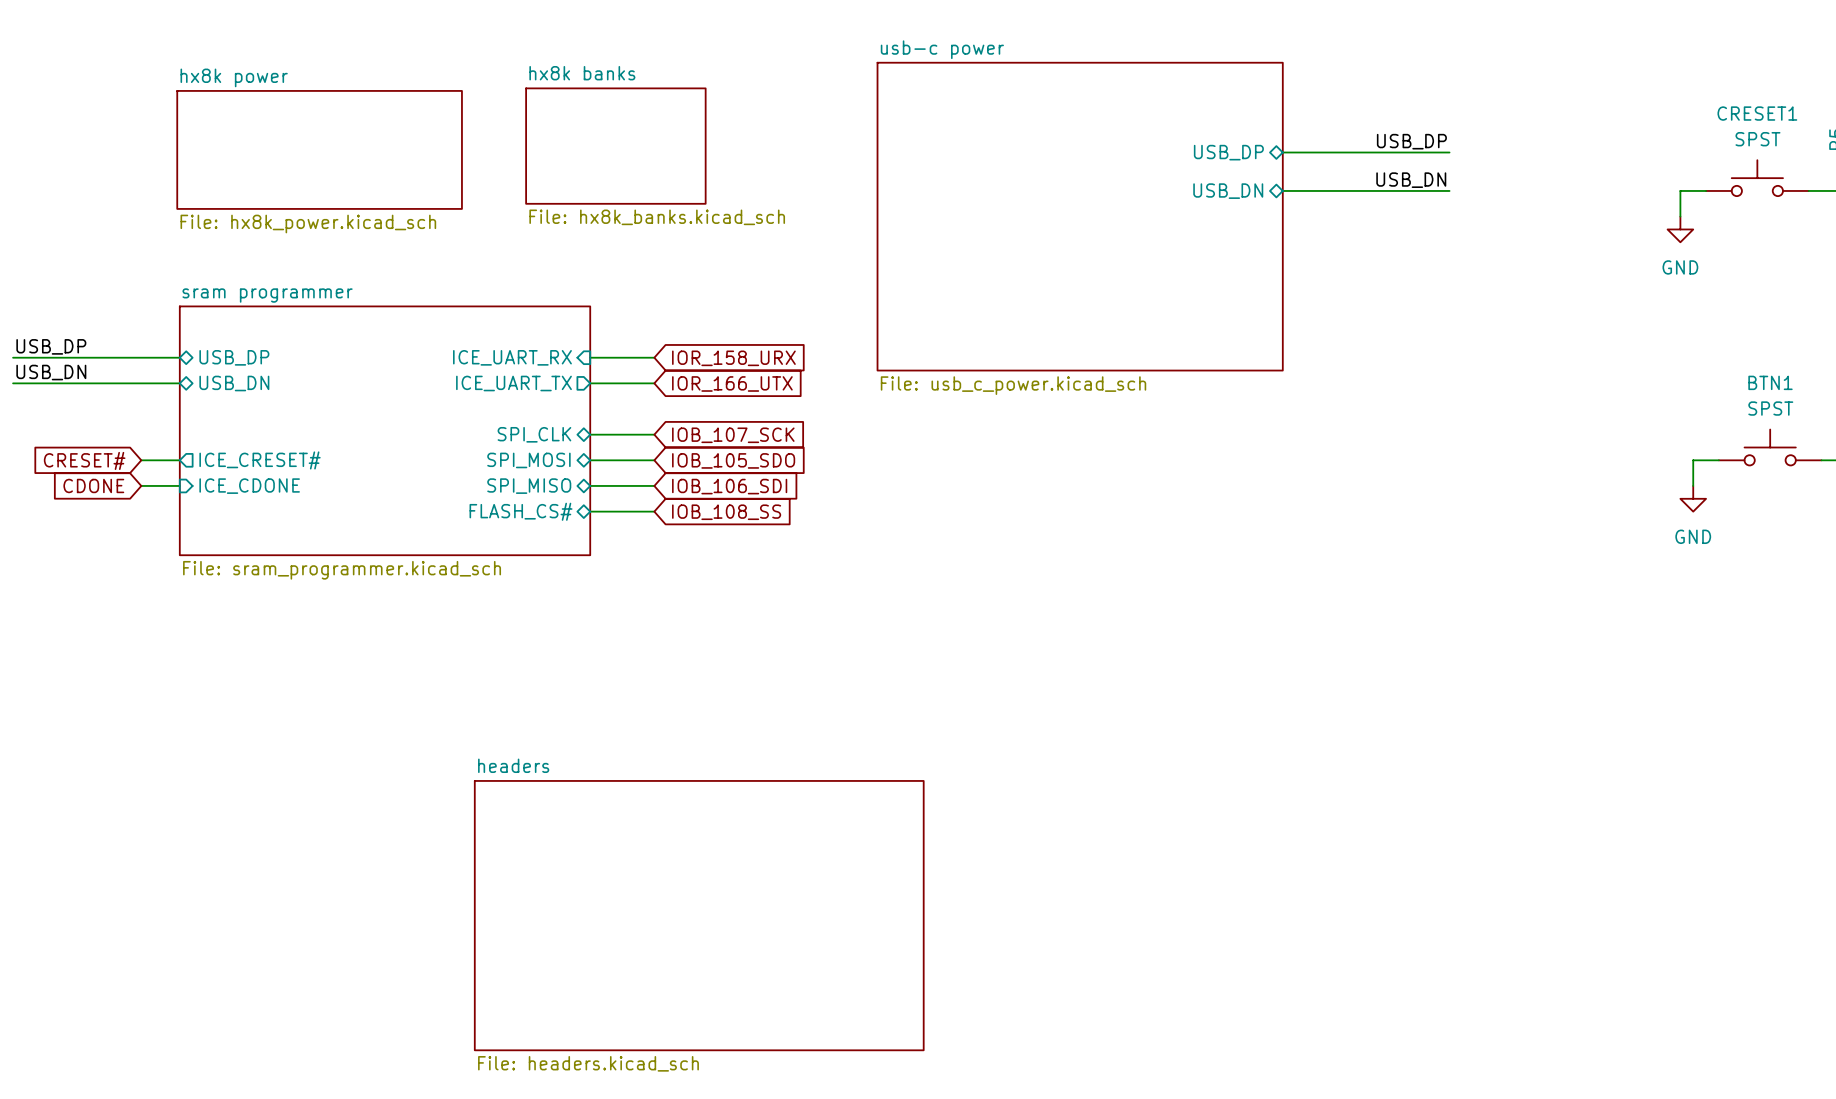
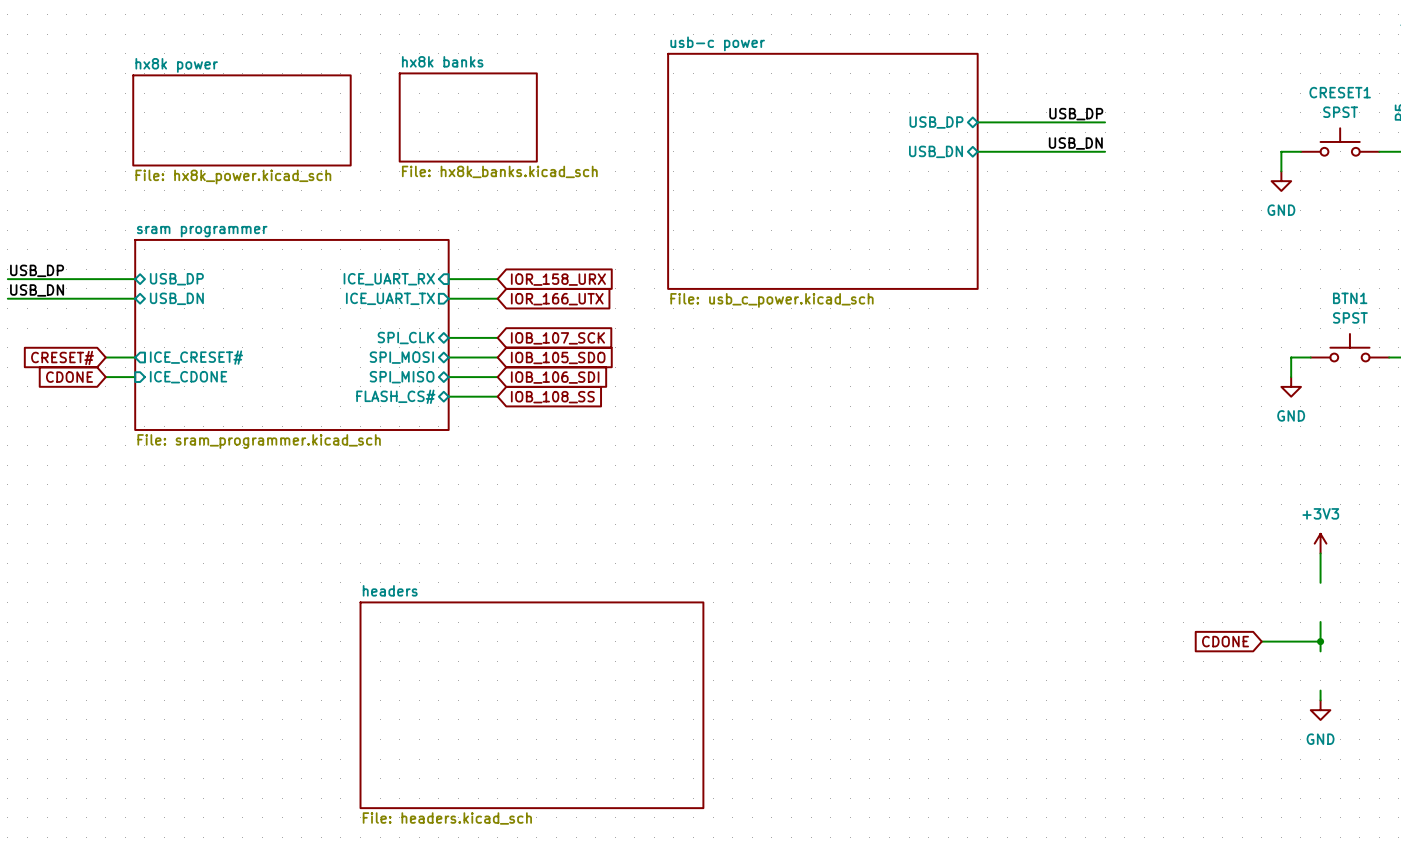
power symbol: none -> +3V3 (1320, 543)
wire: none -> (1320, 553) (1320, 582)
wire: none -> (1320, 622) (1320, 651)
global label: none -> CDONE (1225, 641)
wire: none -> (1261, 641) (1320, 641)
junction: none -> (1320, 641)
wire: none -> (1320, 690) (1320, 700)
power symbol: none -> GND (1320, 710)

